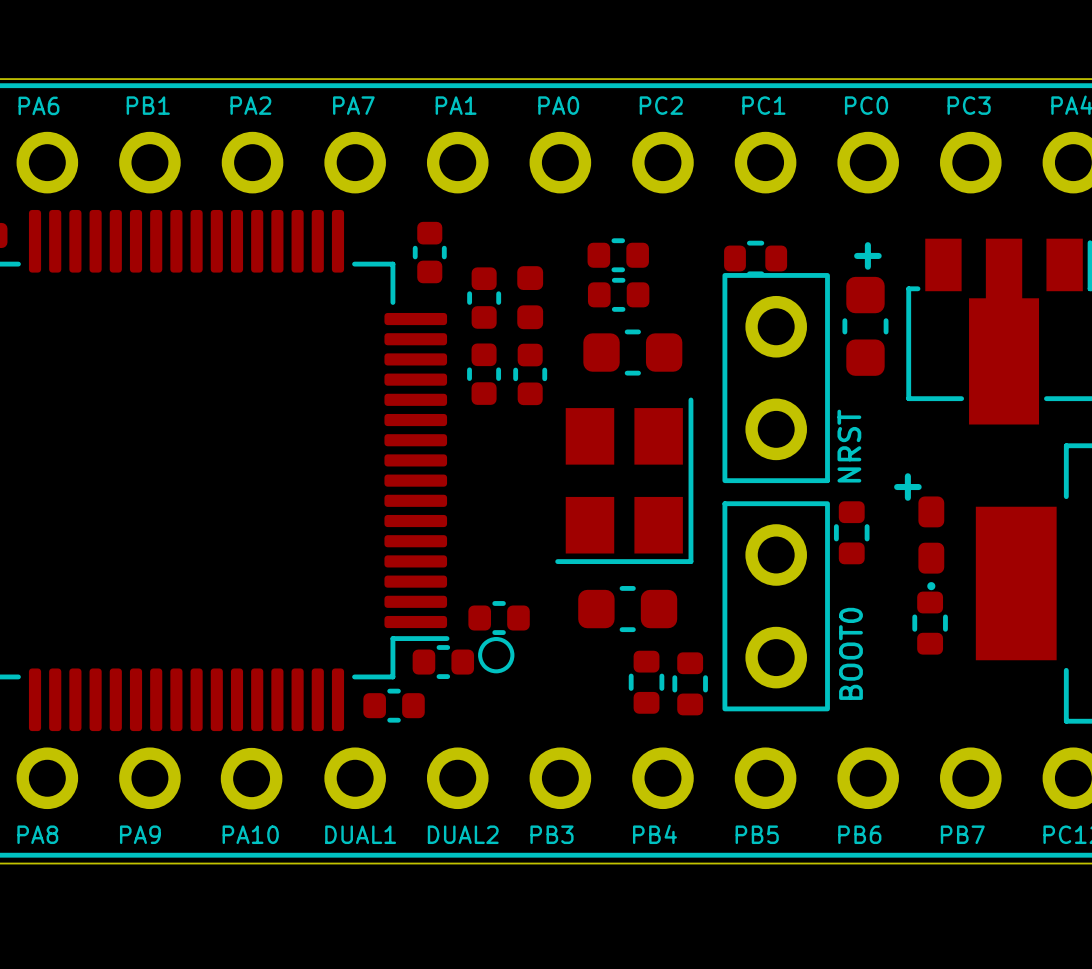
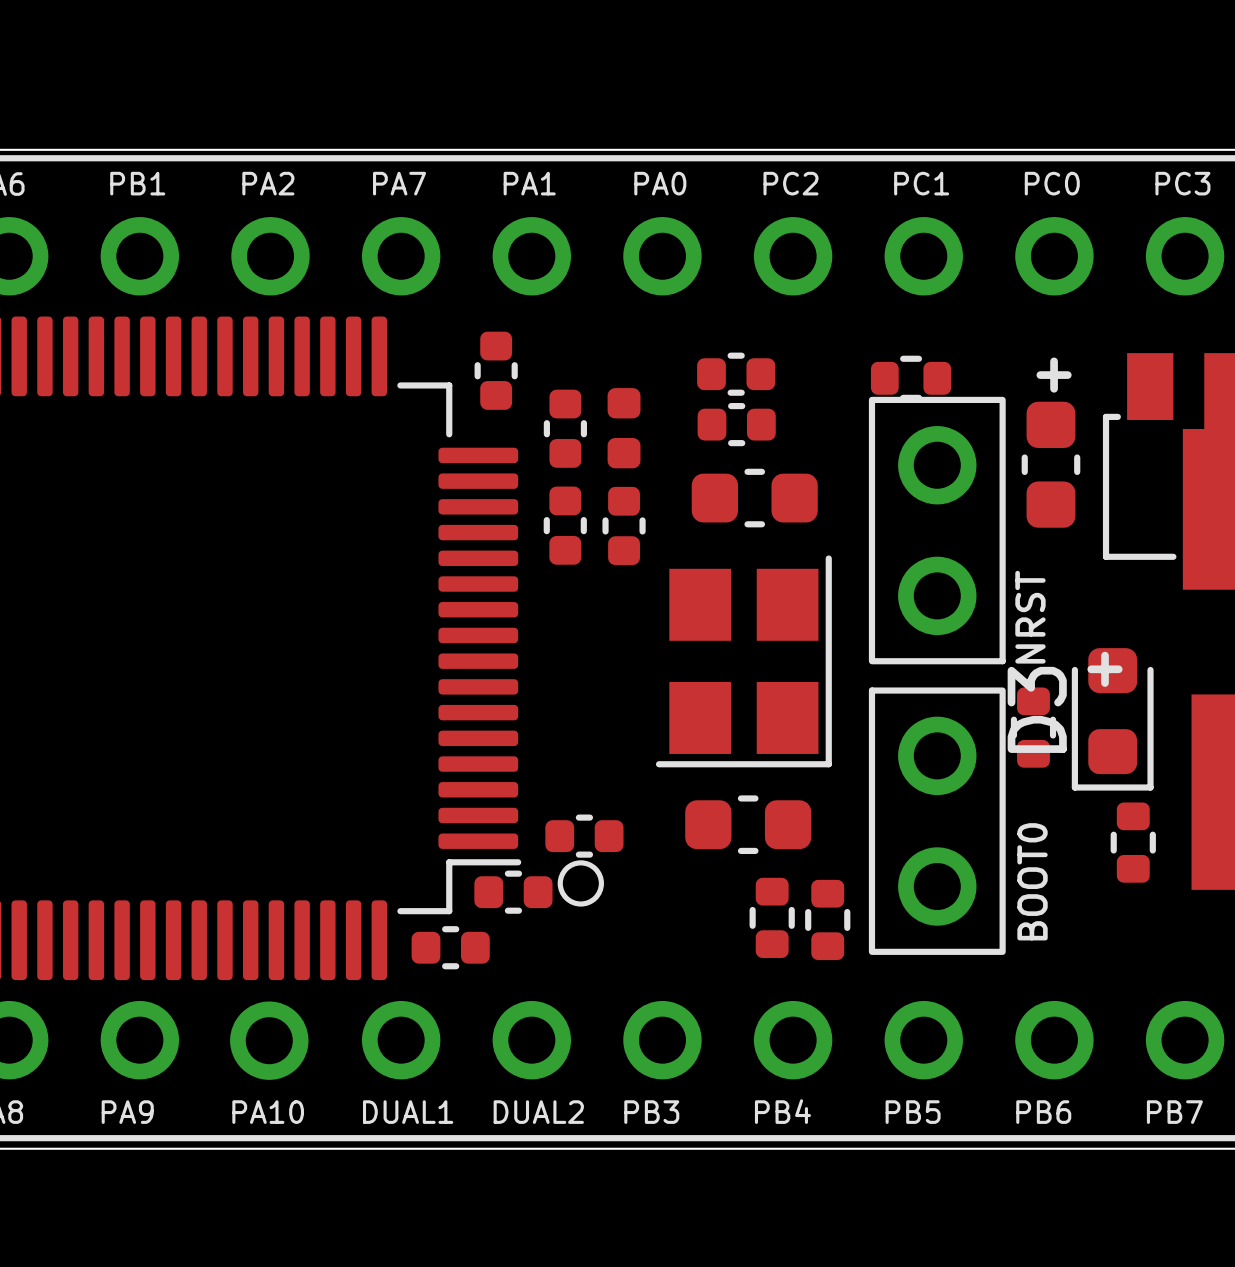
D3: none -> (1112, 719)
part: (931, 543) -> none

